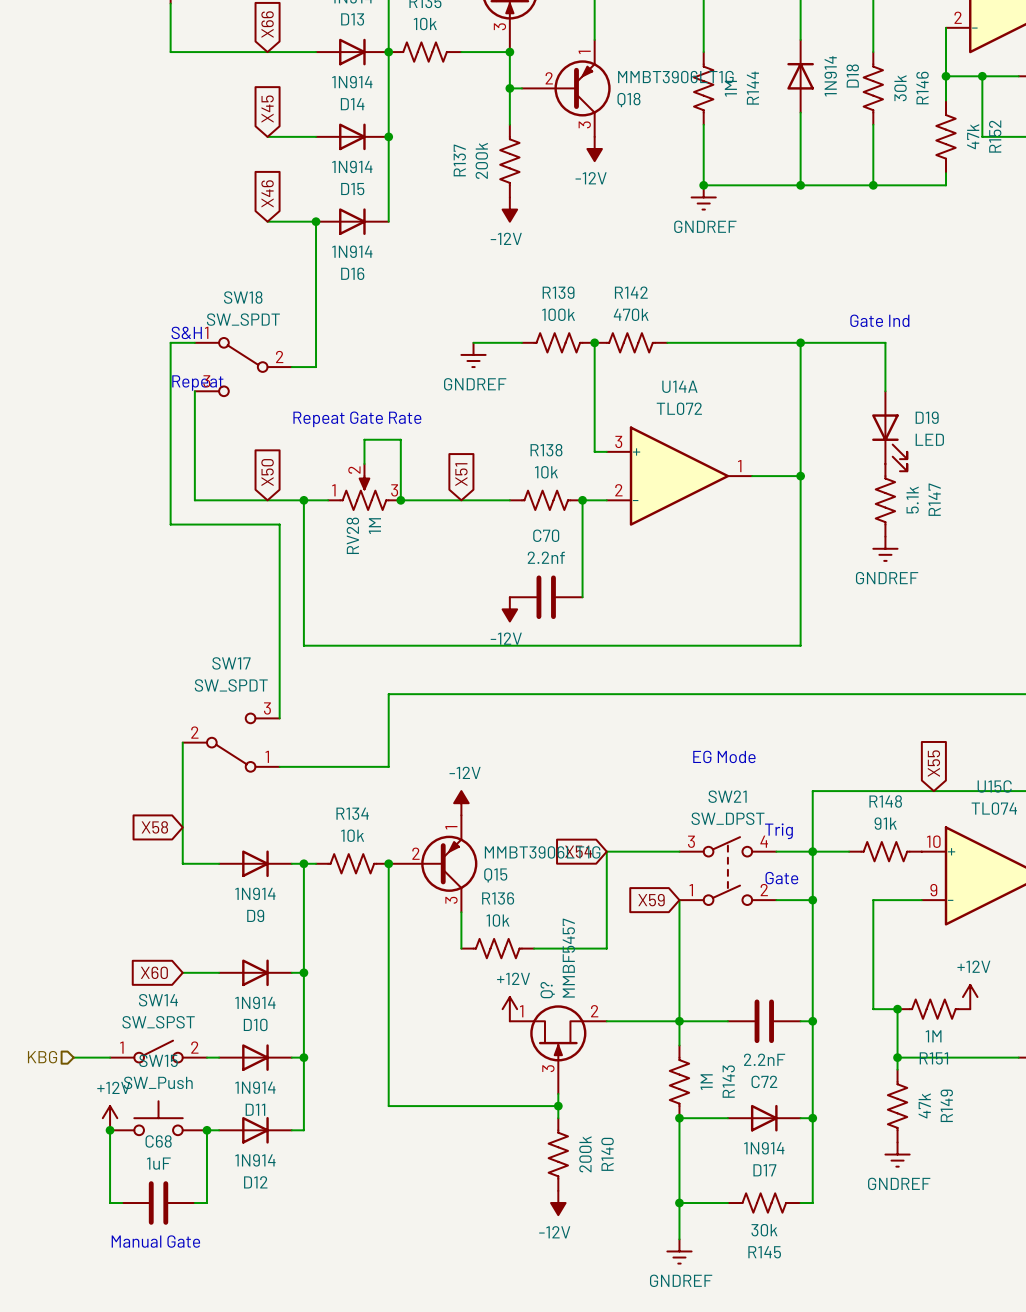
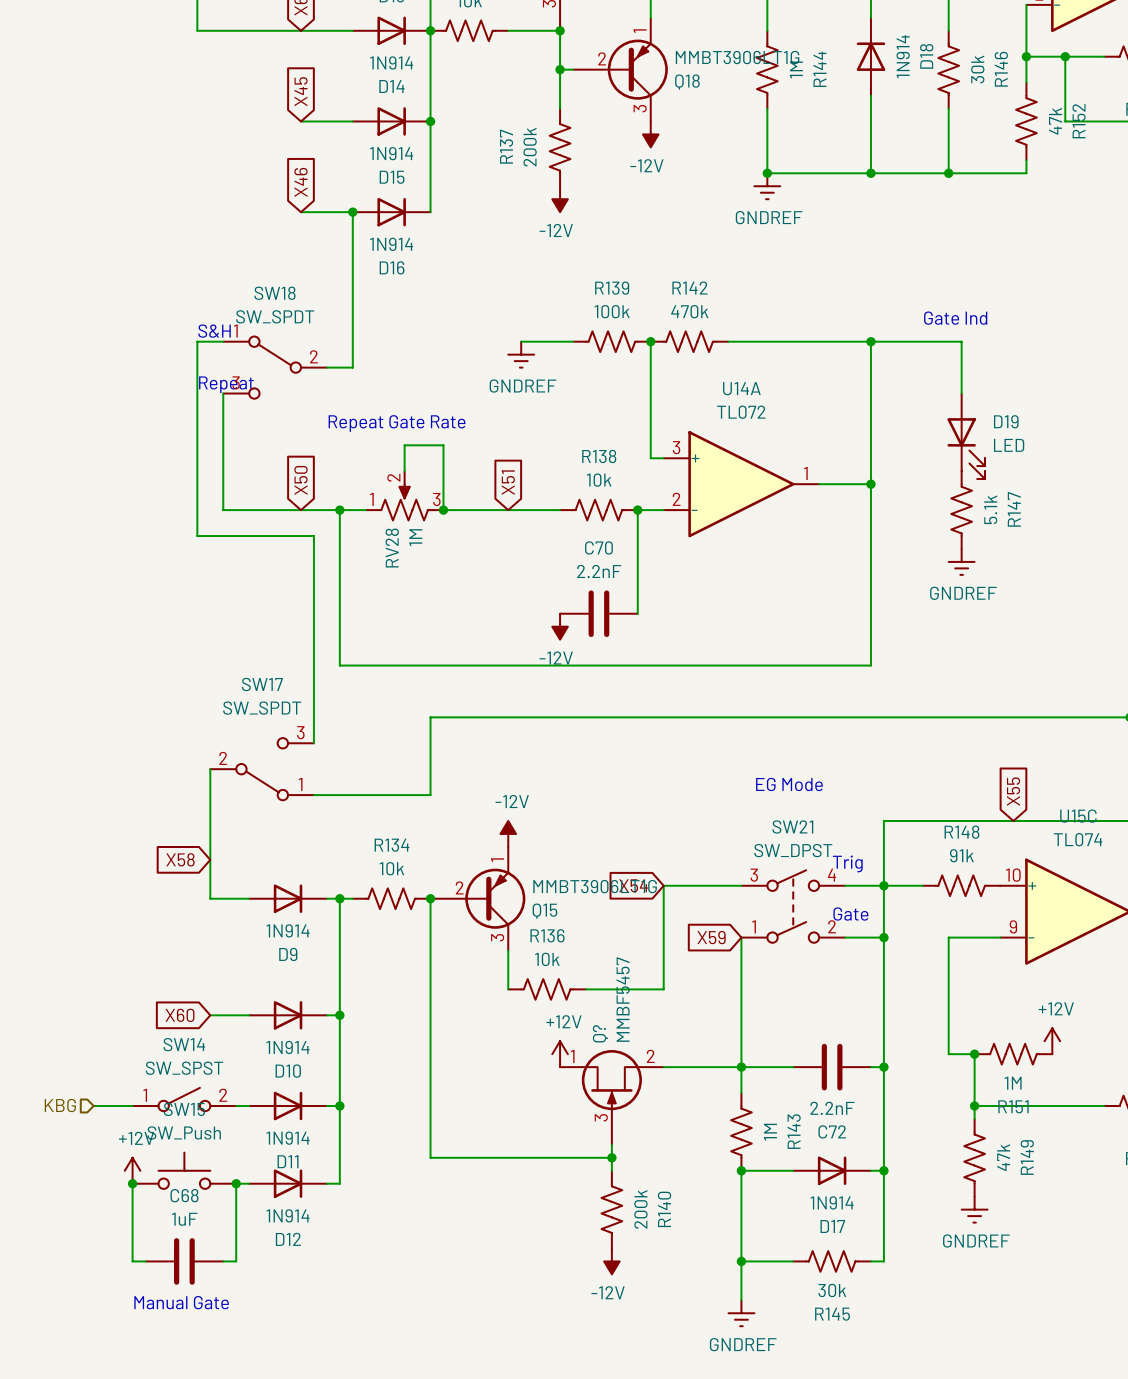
C70 value: 2.2nf (546, 557) -> 2.2nF (599, 571)

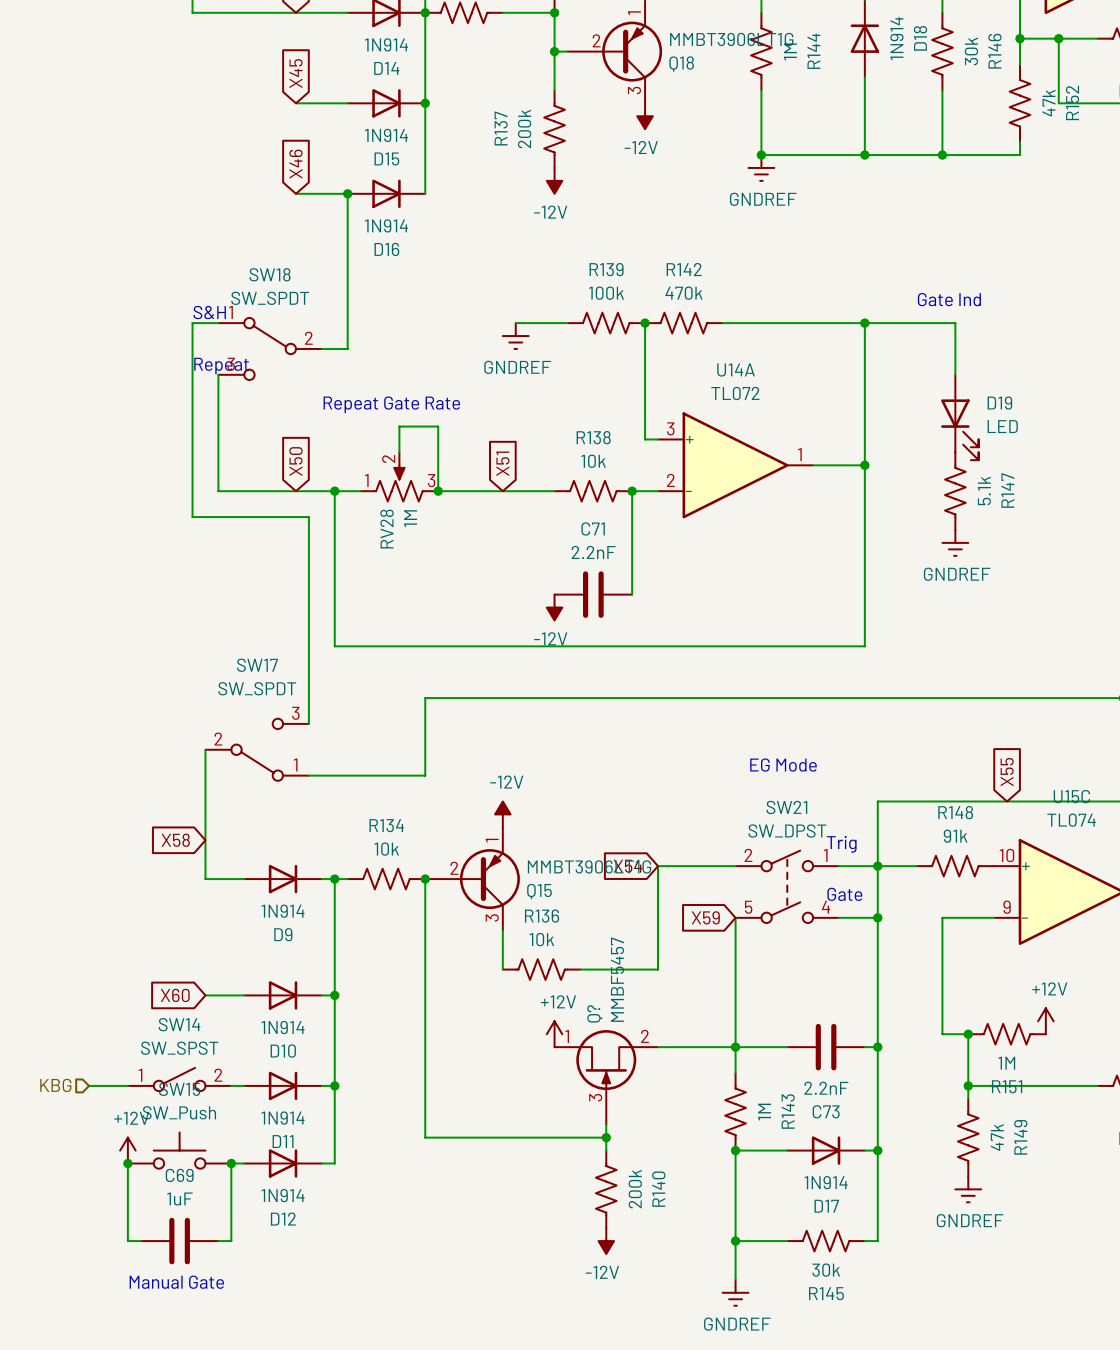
C70 name: C70 (598, 547) -> C71 (593, 528)
SW21 pin number: 3 (754, 875) -> 2 (748, 855)
SW21 pin number: 4 (832, 875) -> 1 (825, 855)
SW21 pin number: 1 (754, 926) -> 5 (748, 907)
SW21 pin number: 2 (832, 926) -> 4 (825, 907)
C72 name: C72 (832, 1131) -> C73 (826, 1111)
C68 name: C68 (184, 1195) -> C69 (179, 1175)

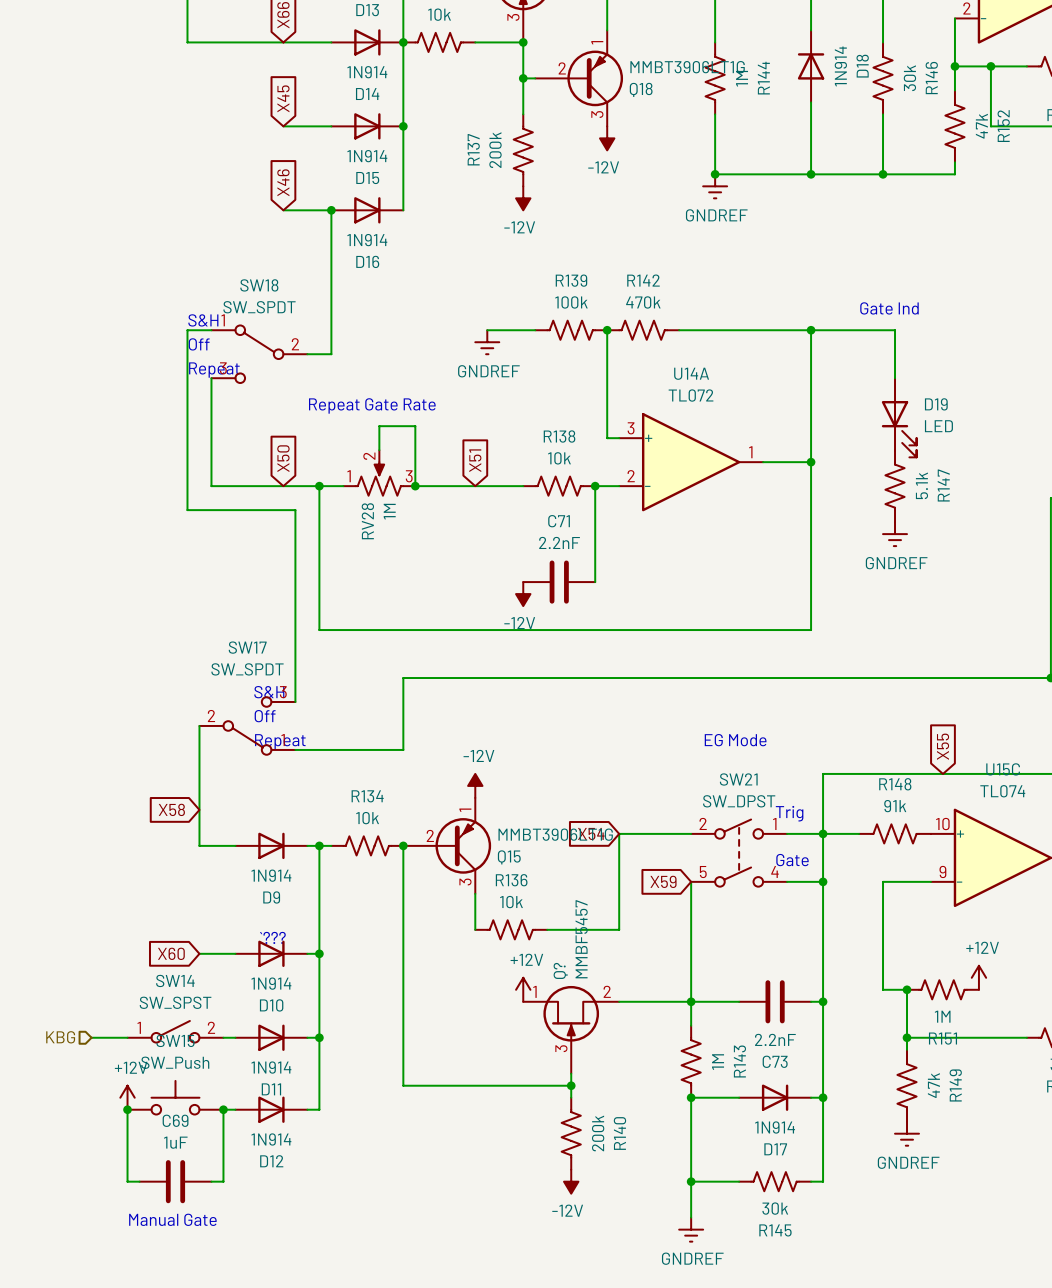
text: none -> Off (199, 344)
text: none -> S&H (269, 692)
text: none -> Off (265, 716)
text: none -> Repeat (280, 741)
text: none -> `??? (272, 937)

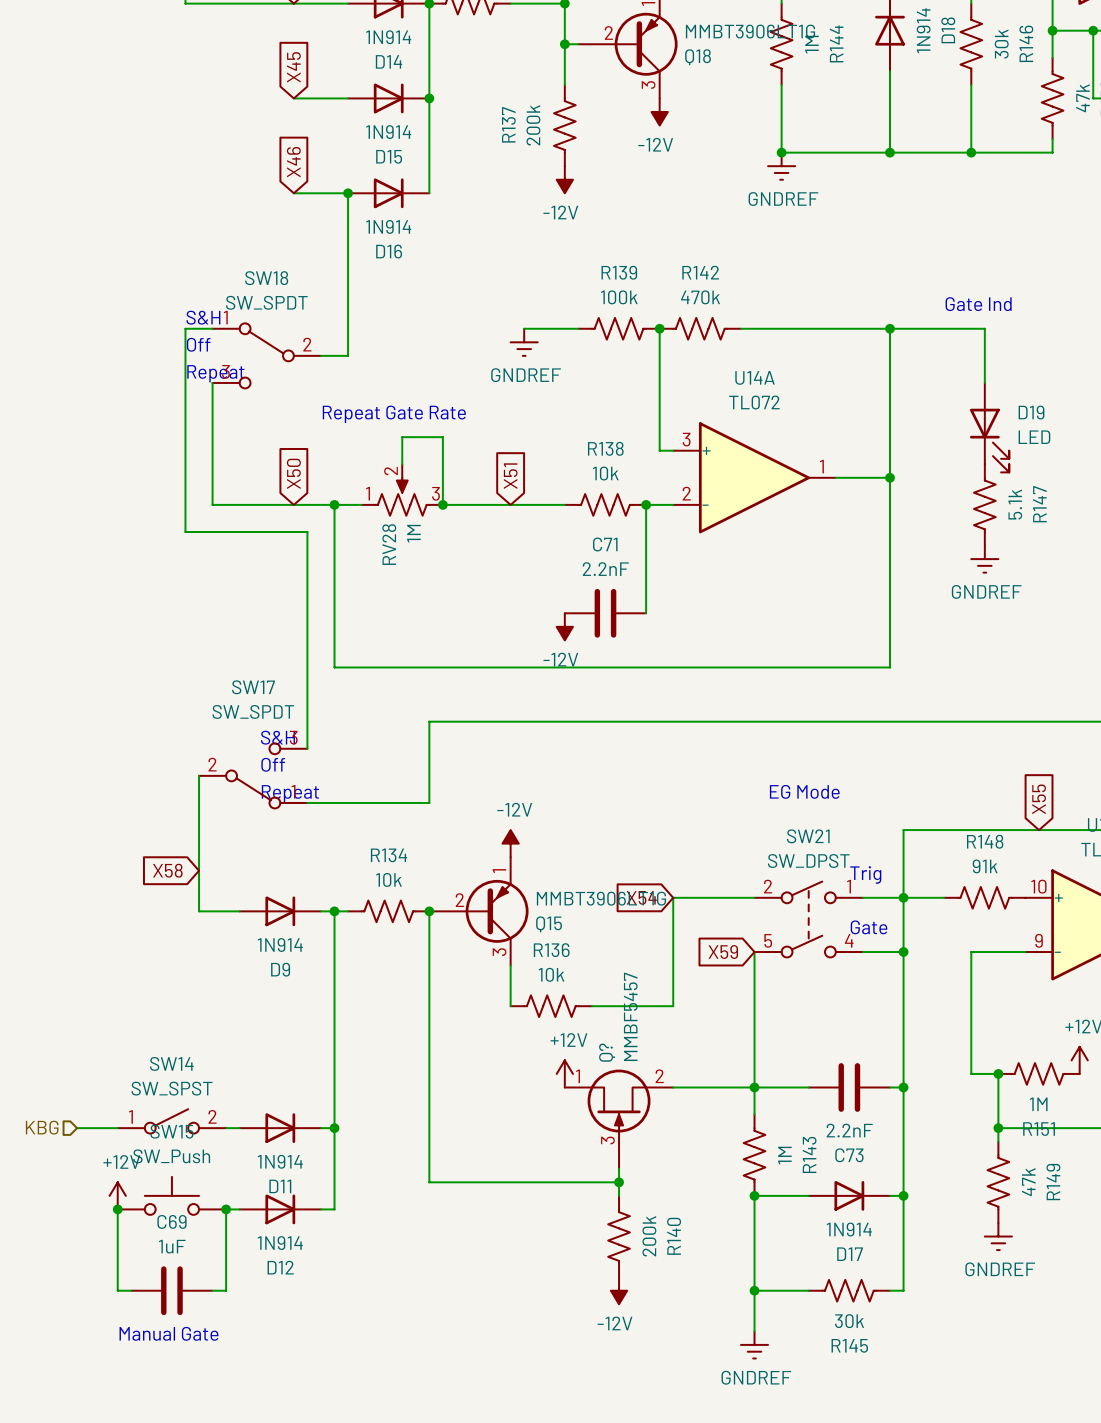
text: `??? (272, 937) -> none
global label: X60 (171, 953) -> none
wire: (199, 953) (235, 953) -> none
D10: 1N914 (271, 953) -> none
wire: (307, 953) (319, 953) -> none
junction: (319, 953) -> none

